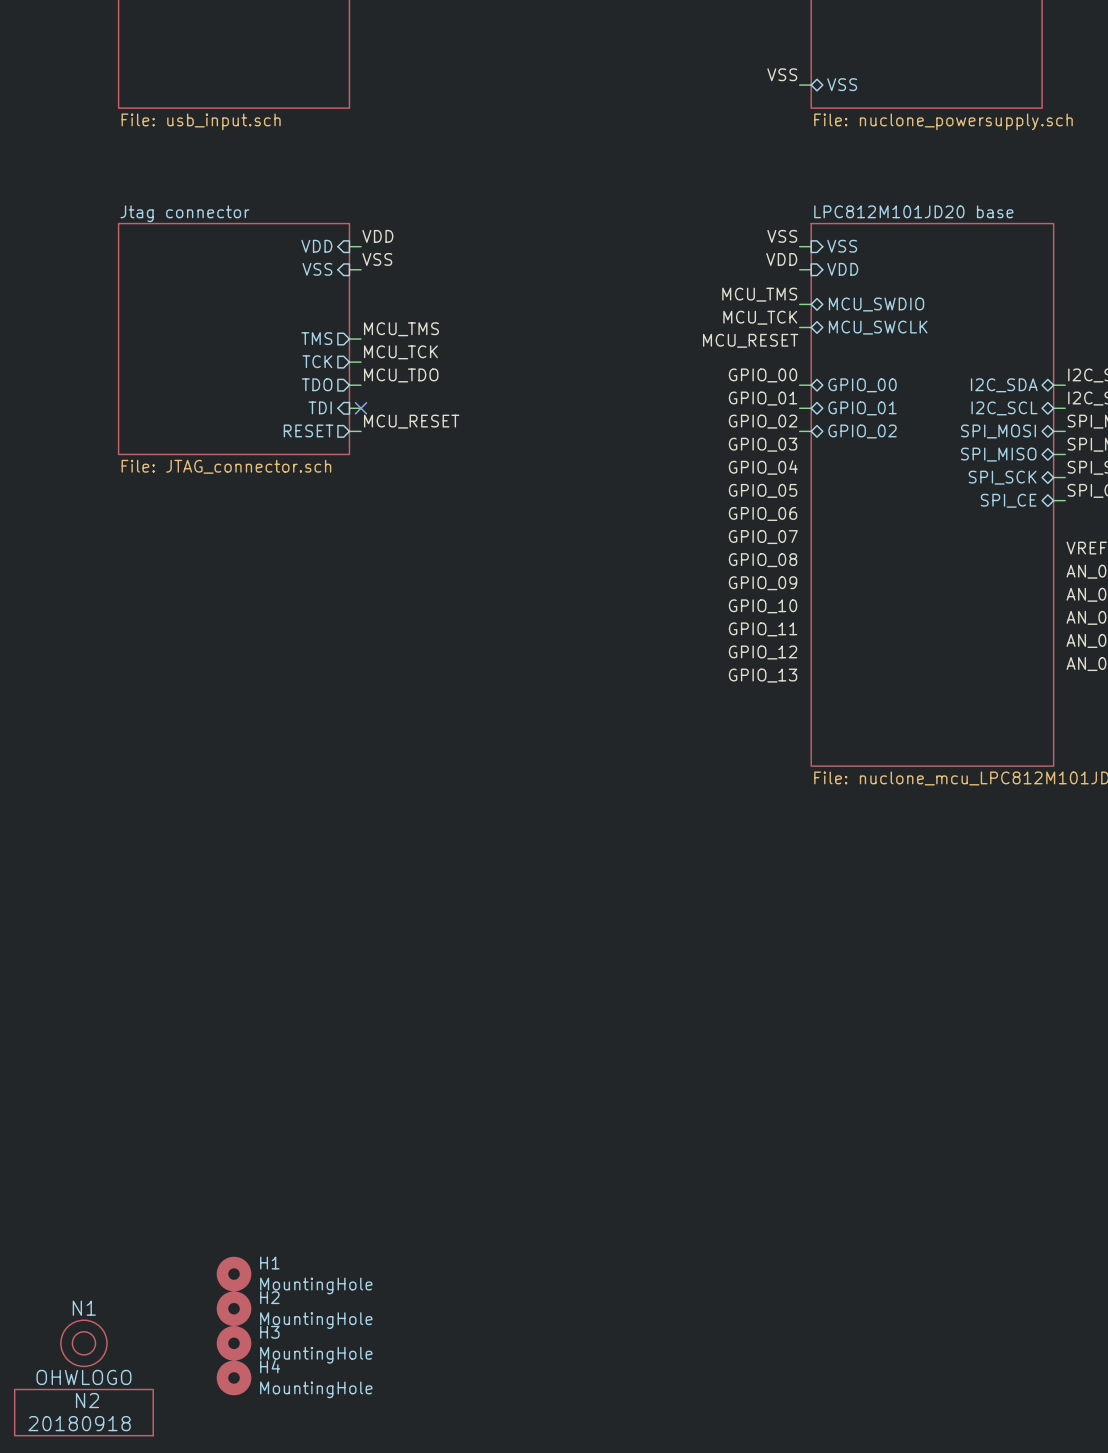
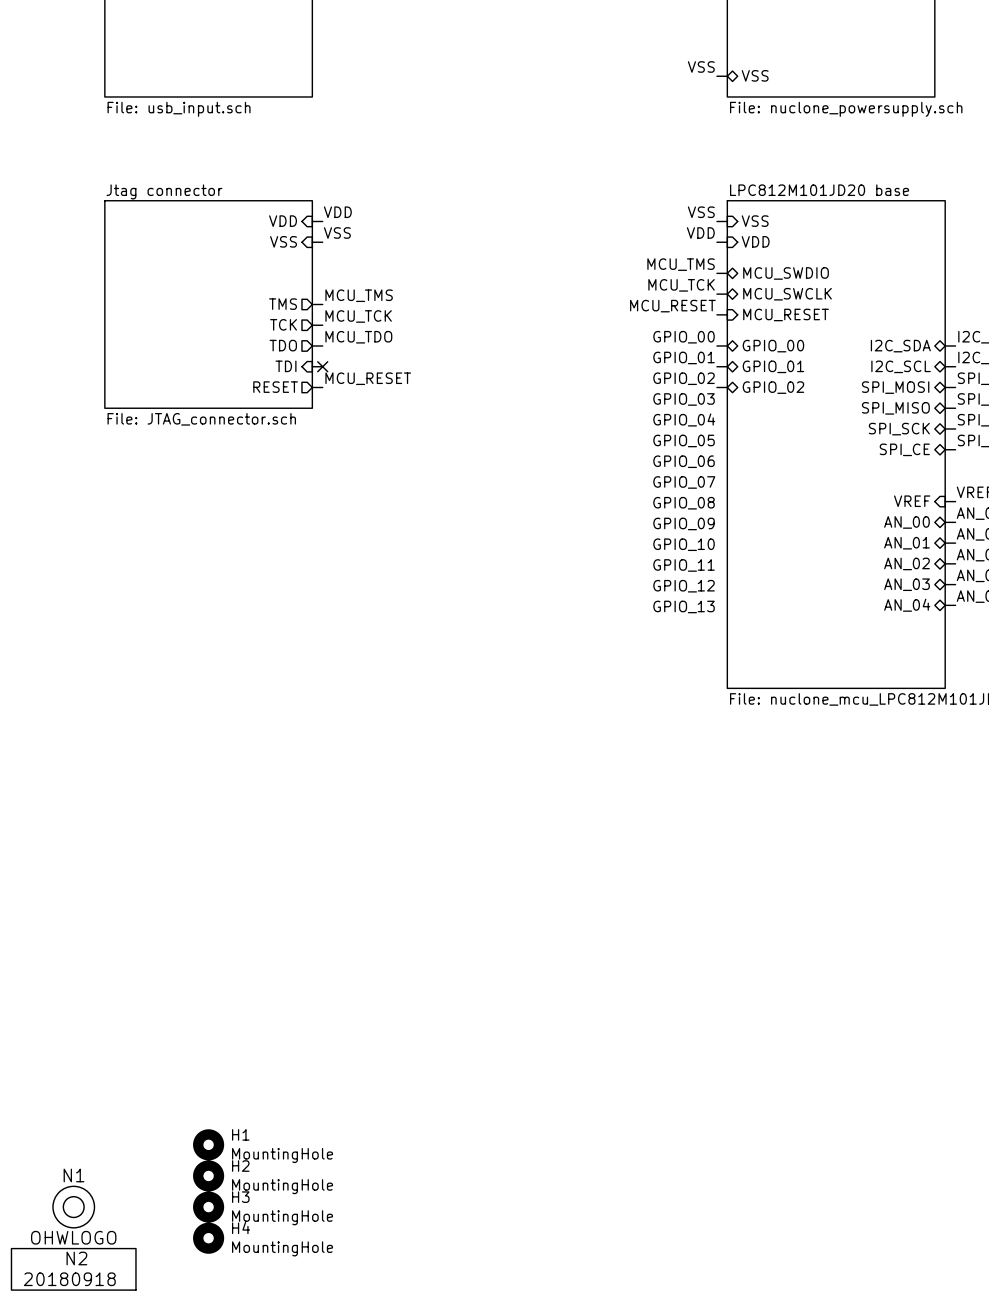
wire: none -> (716, 314) (727, 314)
sheet pin: none -> MCU_RESET (786, 314)
sheet pin: none -> VREF (912, 501)
wire: none -> (945, 501) (955, 501)
sheet pin: none -> AN_00 (906, 522)
wire: none -> (945, 522) (955, 522)
sheet pin: none -> AN_01 (906, 543)
wire: none -> (945, 543) (955, 543)
sheet pin: none -> AN_02 (906, 563)
wire: none -> (945, 563) (955, 563)
sheet pin: none -> AN_03 (906, 584)
wire: none -> (945, 584) (955, 584)
sheet pin: none -> AN_04 (907, 605)
wire: none -> (945, 605) (955, 605)

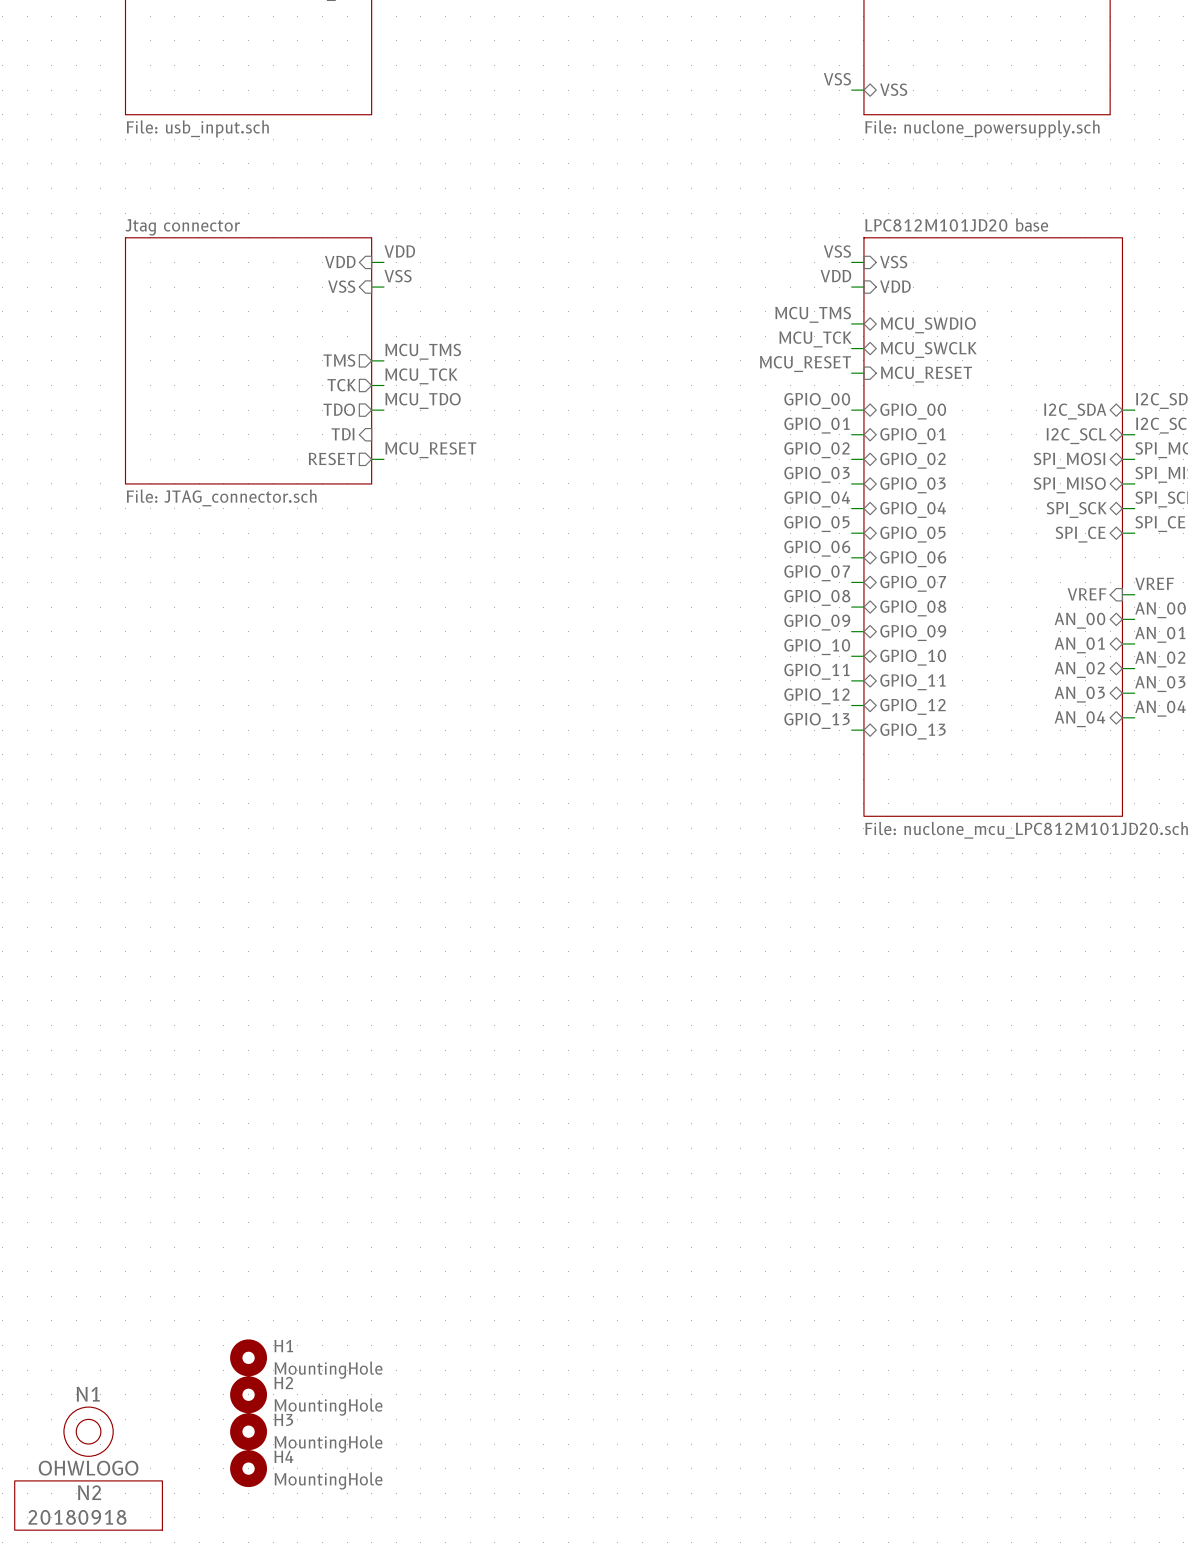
wire: (312, 366) (322, 366) -> none
no-connect mark: (322, 366) -> none
wire: none -> (851, 483) (863, 483)
sheet pin: none -> GPIO_03 (912, 485)
wire: none -> (851, 508) (863, 508)
sheet pin: none -> GPIO_04 (913, 509)
wire: none -> (851, 533) (863, 533)
sheet pin: none -> GPIO_05 (912, 534)
wire: none -> (851, 557) (863, 557)
sheet pin: none -> GPIO_06 (913, 559)
wire: none -> (851, 582) (863, 582)
sheet pin: none -> GPIO_07 (913, 583)
wire: none -> (851, 607) (863, 607)
sheet pin: none -> GPIO_08 (913, 608)
wire: none -> (851, 631) (863, 631)
sheet pin: none -> GPIO_09 (913, 633)
wire: none -> (851, 656) (863, 656)
sheet pin: none -> GPIO_10 (913, 657)
wire: none -> (851, 680) (863, 680)
sheet pin: none -> GPIO_11 (912, 682)
wire: none -> (851, 705) (863, 705)
sheet pin: none -> GPIO_12 (912, 706)
wire: none -> (851, 730) (863, 730)
sheet pin: none -> GPIO_13 (912, 731)

